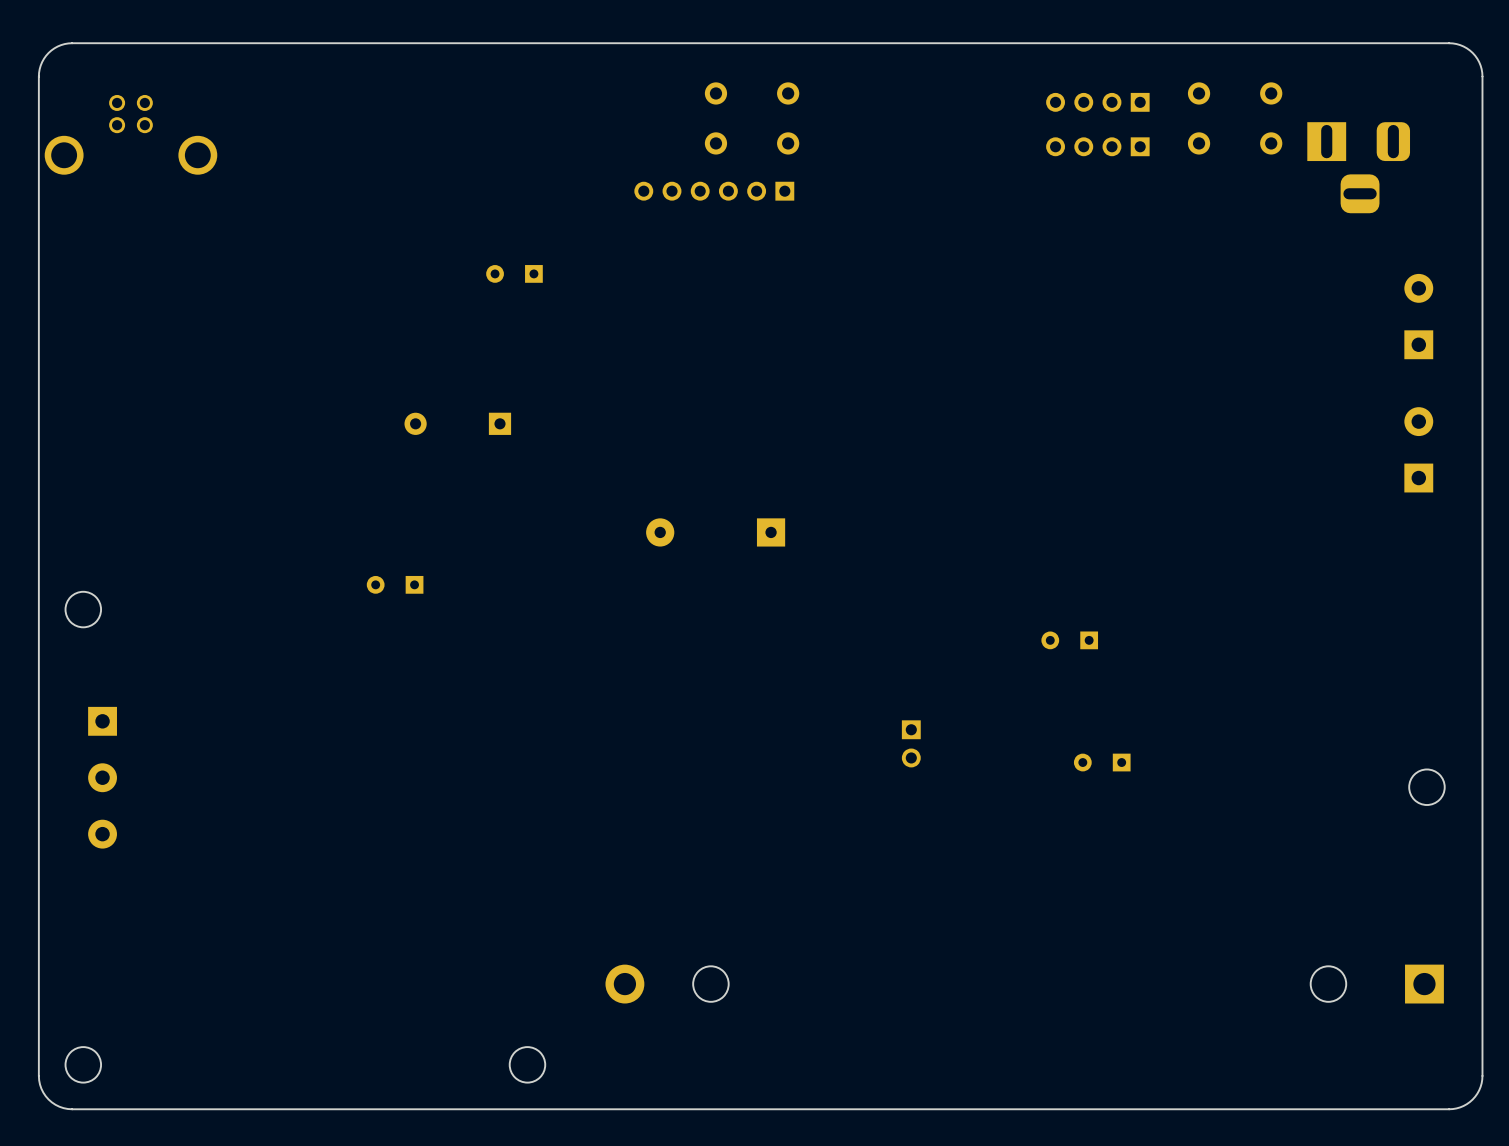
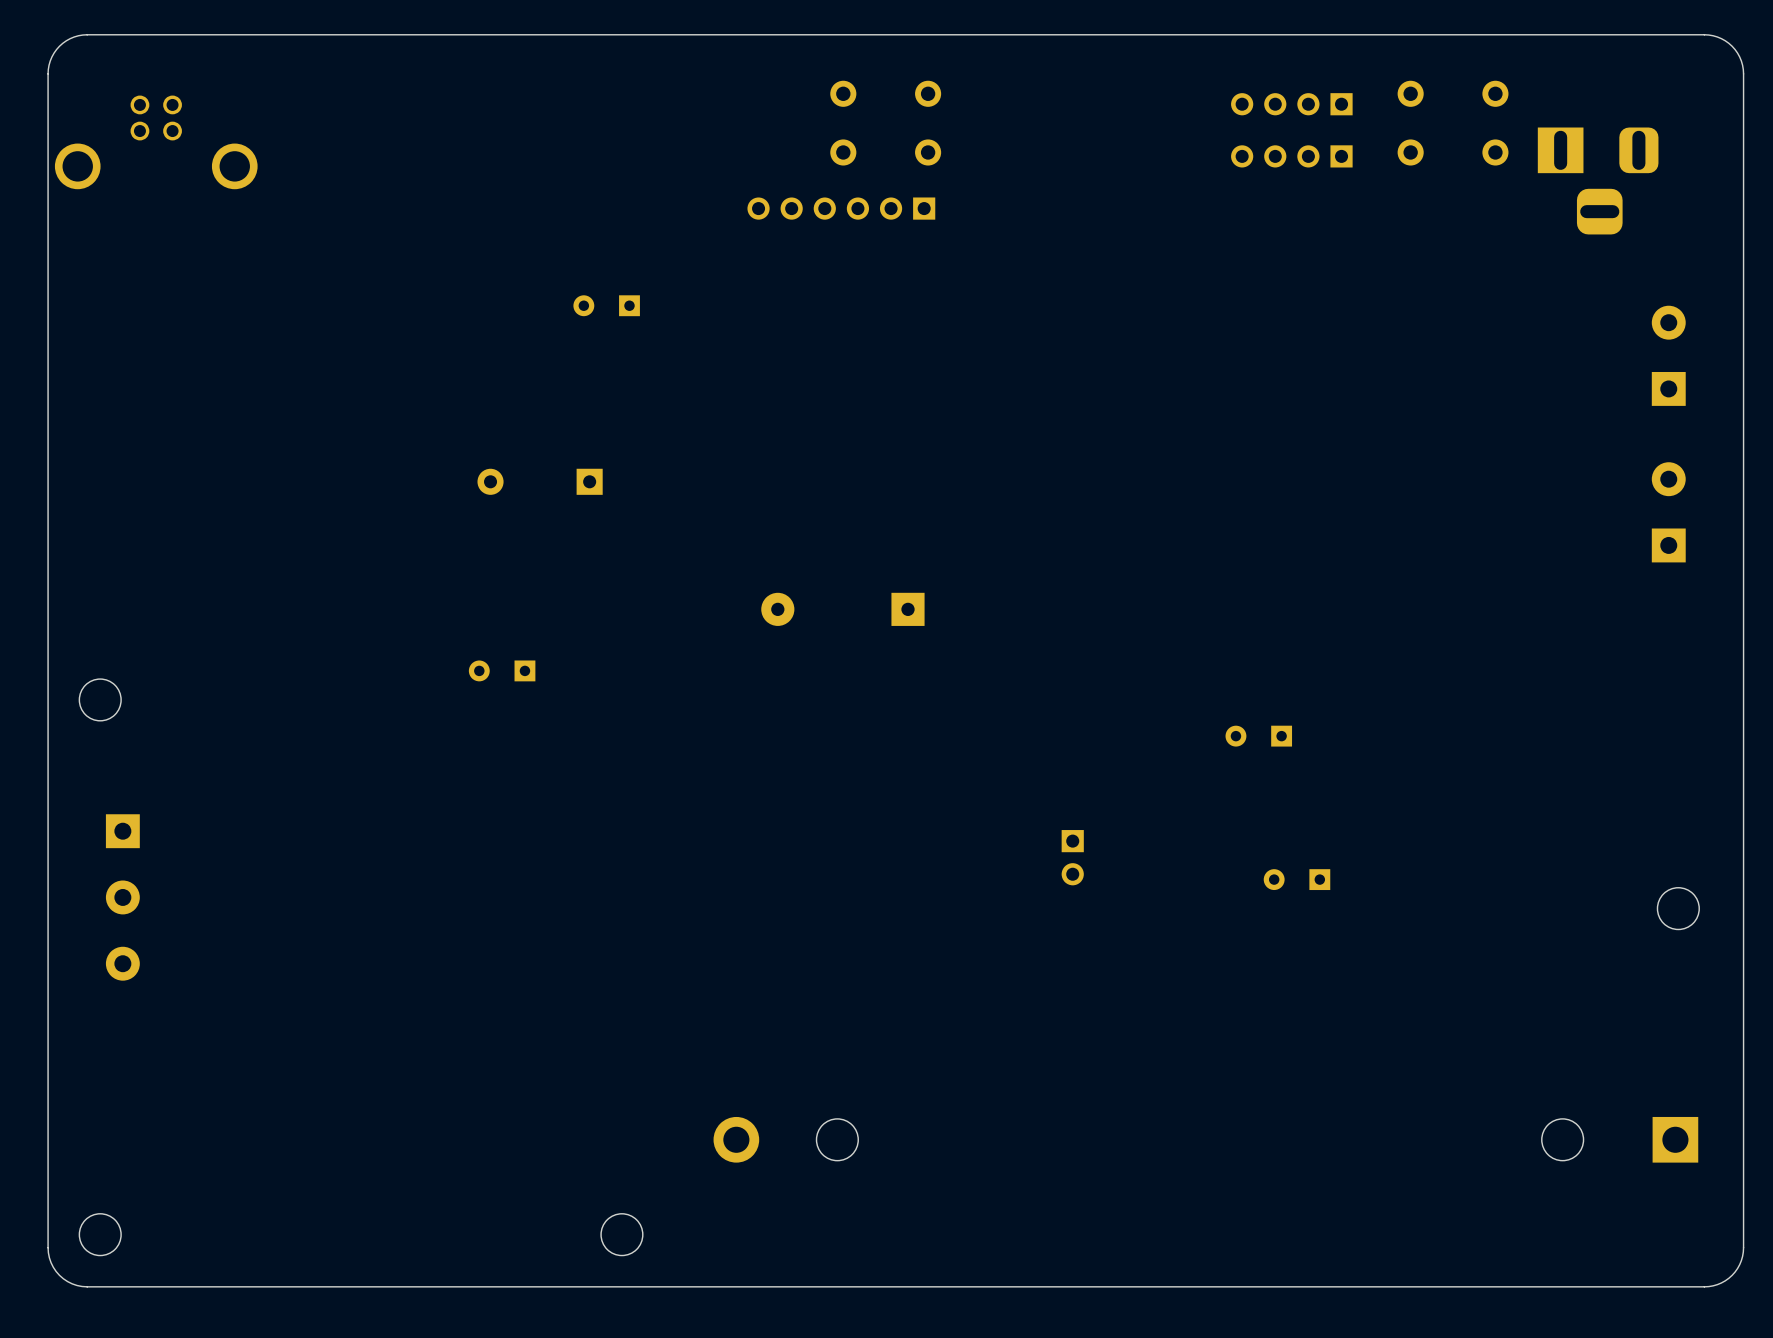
part position: (395, 584) -> (502, 670)

